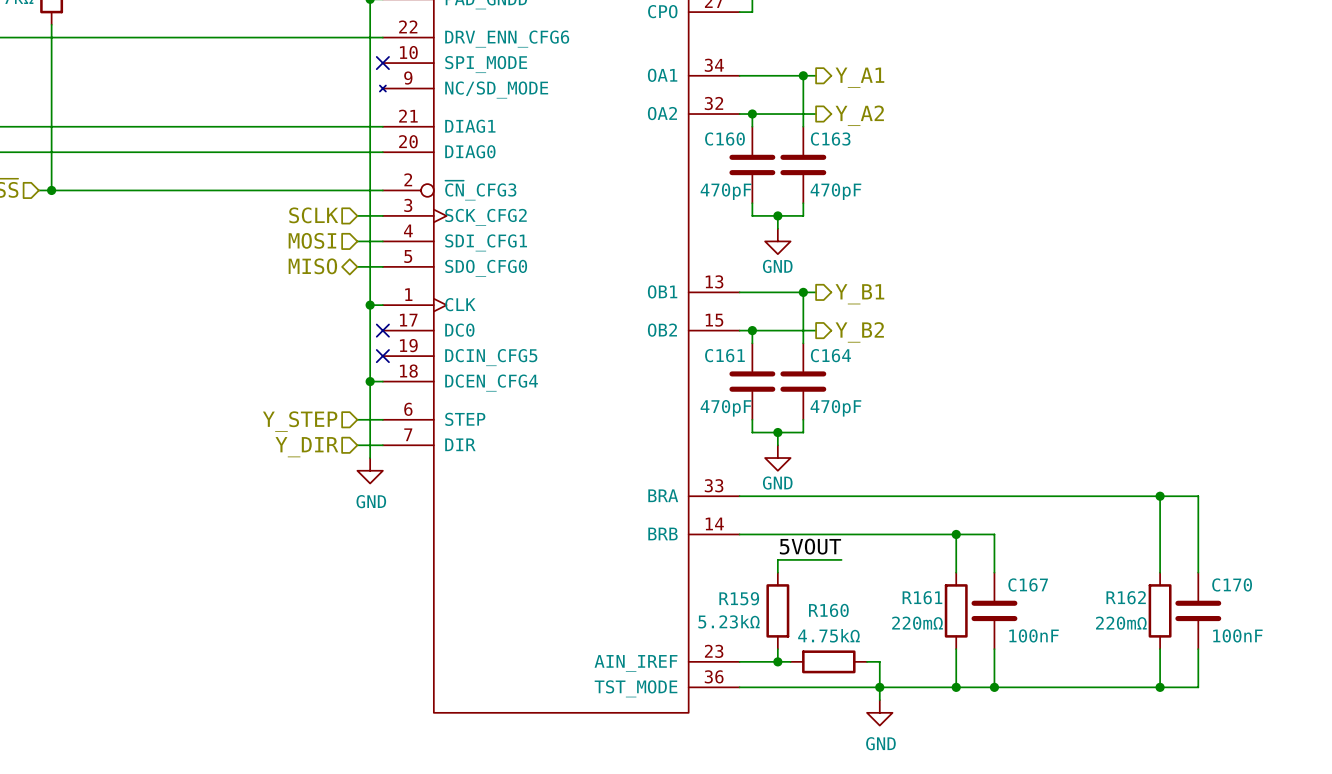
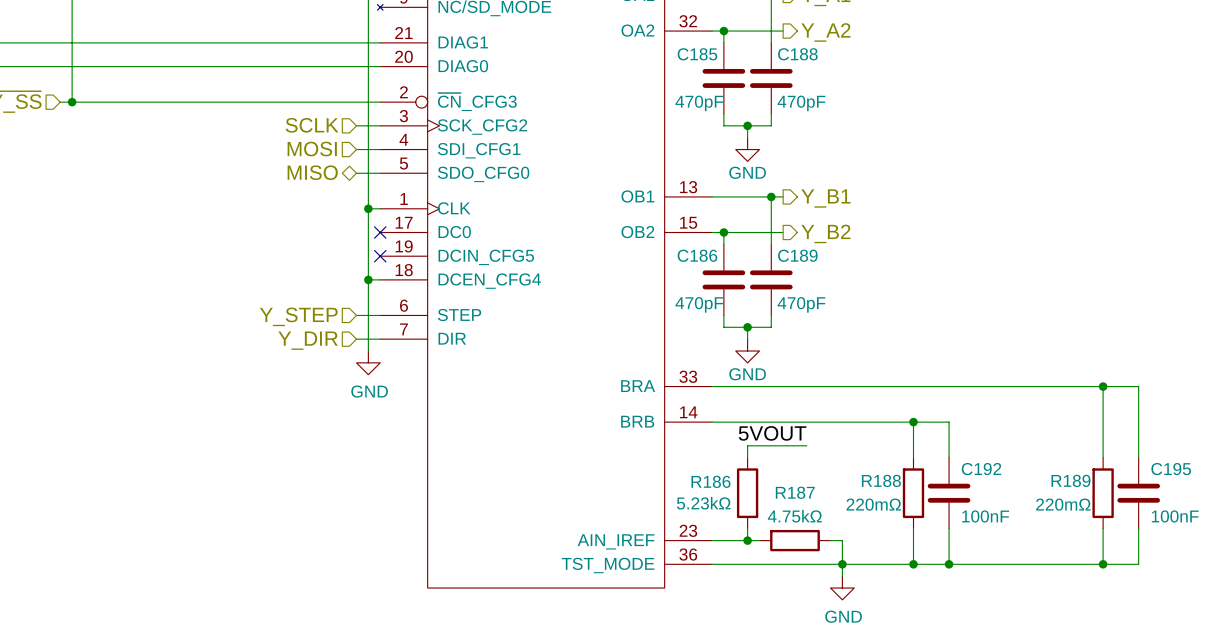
C160 name: C160 (724, 139) -> C185 (697, 54)
C163 name: C163 (830, 139) -> C188 (797, 54)
C161 name: C161 (724, 355) -> C186 (697, 255)
C164 name: C164 (830, 355) -> C189 (797, 255)
C167 name: C167 (1028, 584) -> C192 (981, 469)
C170 name: C170 (1232, 584) -> C195 (1171, 469)
R161 name: R161 (922, 597) -> R188 (881, 480)
R162 name: R162 (1126, 597) -> R189 (1070, 480)
R159 name: R159 (739, 598) -> R186 (710, 481)
R160 name: R160 (828, 610) -> R187 (795, 492)

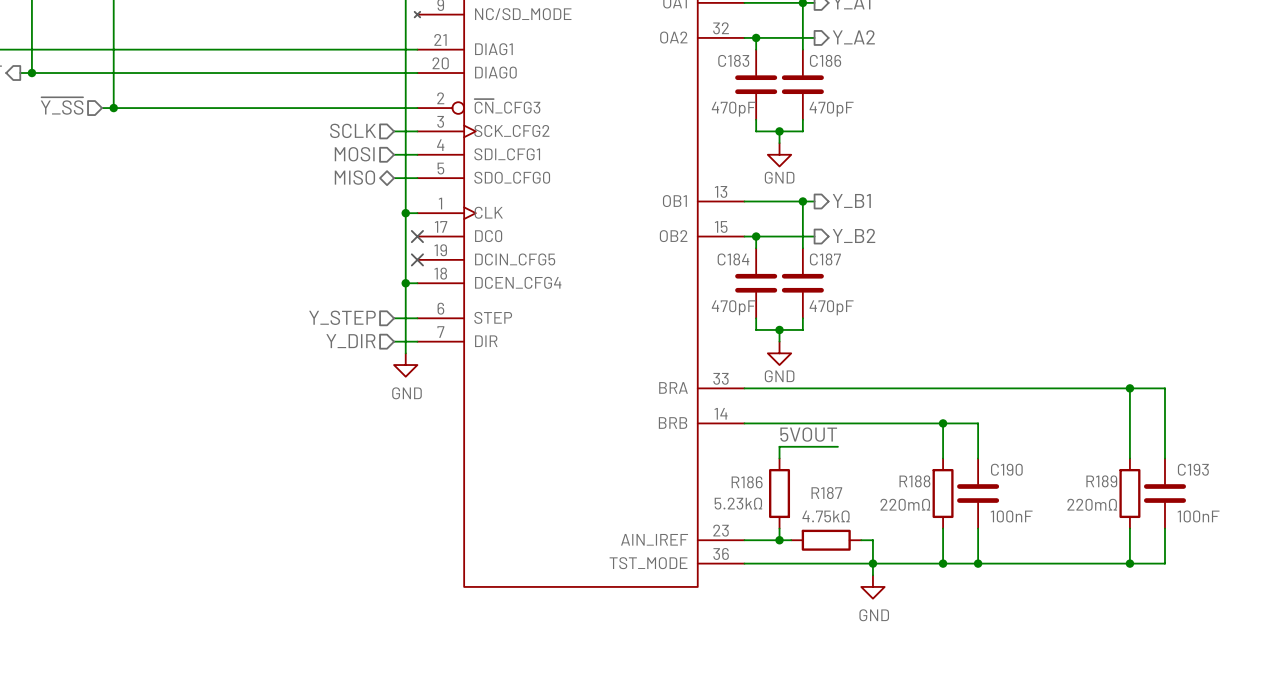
C185 name: C185 (697, 54) -> C183 (733, 60)
C188 name: C188 (797, 54) -> C186 (825, 60)
C186 name: C186 (697, 255) -> C184 (733, 259)
C189 name: C189 (797, 255) -> C187 (825, 259)
C192 name: C192 (981, 469) -> C190 (1006, 469)
C195 name: C195 (1171, 469) -> C193 (1193, 469)

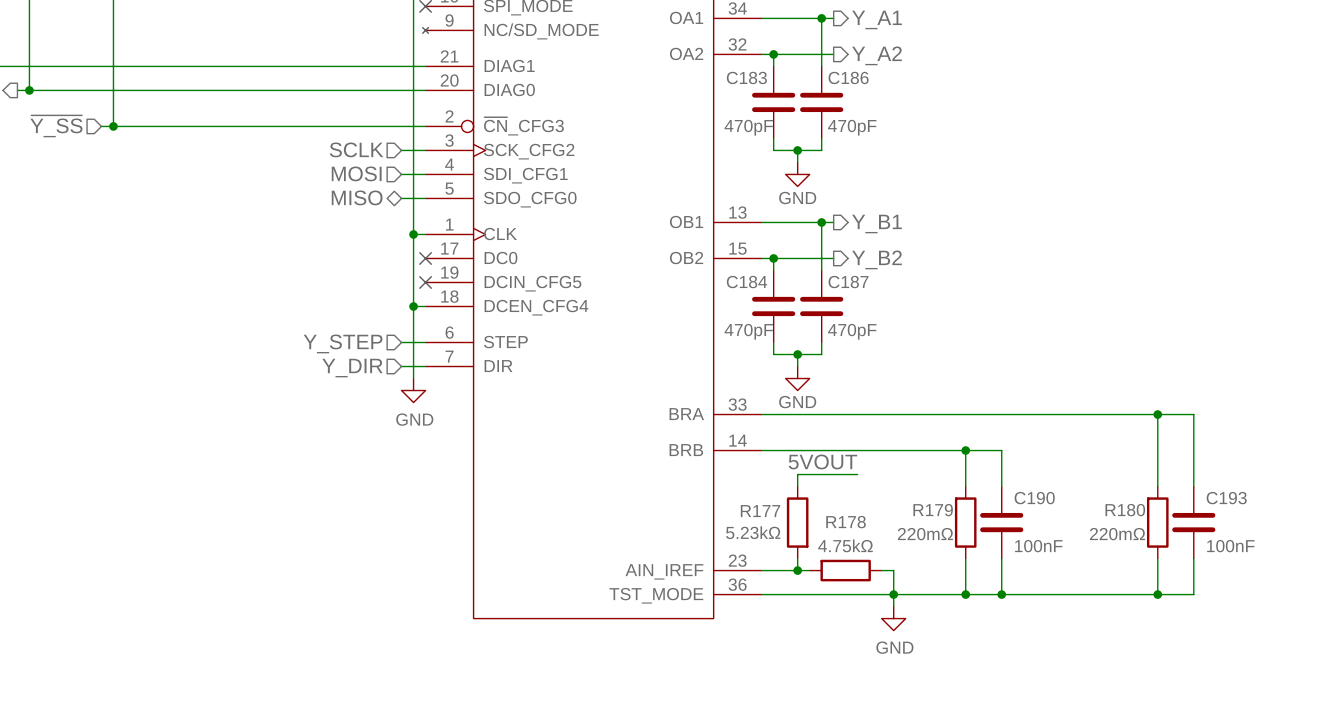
R188 name: R188 (914, 481) -> R179 (933, 510)
R189 name: R189 (1101, 481) -> R180 (1125, 510)
R186 name: R186 (747, 482) -> R177 (760, 511)
R187 name: R187 (826, 493) -> R178 (846, 522)

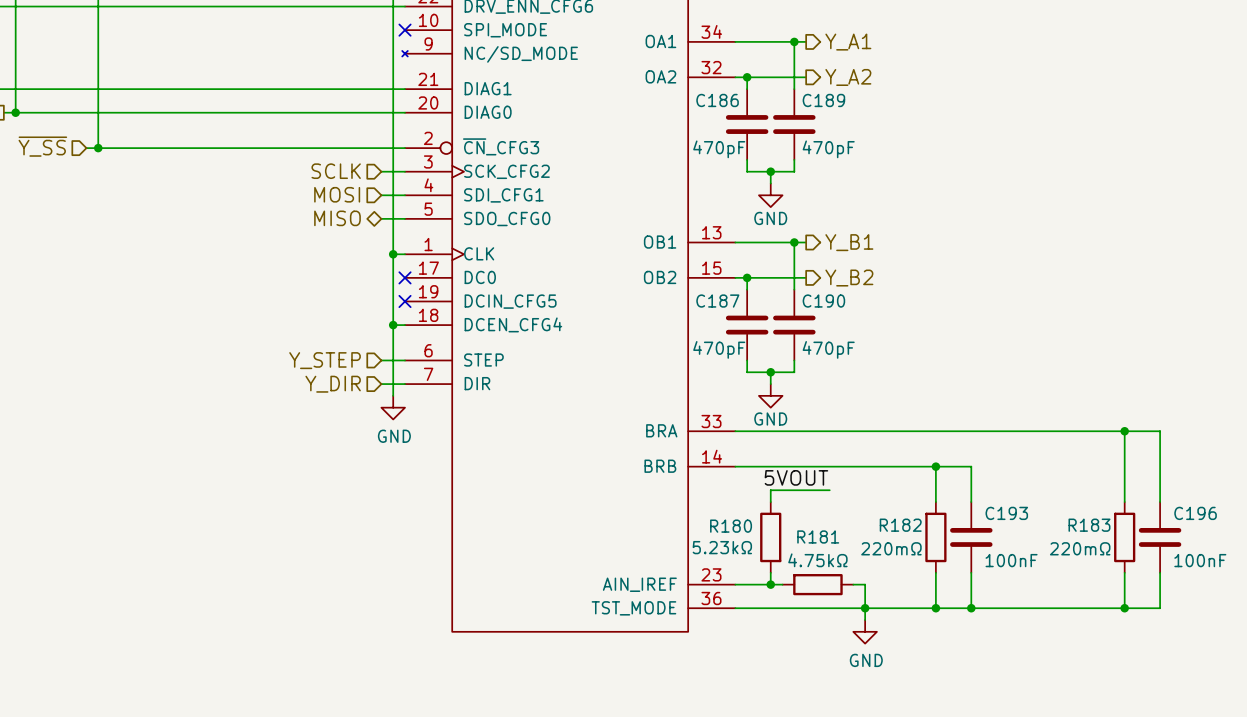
C183 name: C183 (746, 77) -> C186 (717, 100)
C186 name: C186 (848, 77) -> C189 (823, 100)
C184 name: C184 (746, 282) -> C187 (717, 301)
C187 name: C187 (848, 282) -> C190 (823, 301)
C190 name: C190 (1034, 498) -> C193 (1006, 513)
C193 name: C193 (1226, 498) -> C196 (1195, 513)
R179 name: R179 (933, 510) -> R182 (900, 525)
R180 name: R180 (1125, 510) -> R183 (1089, 525)
R177 name: R177 (760, 511) -> R180 (731, 526)
R178 name: R178 (846, 522) -> R181 (818, 537)

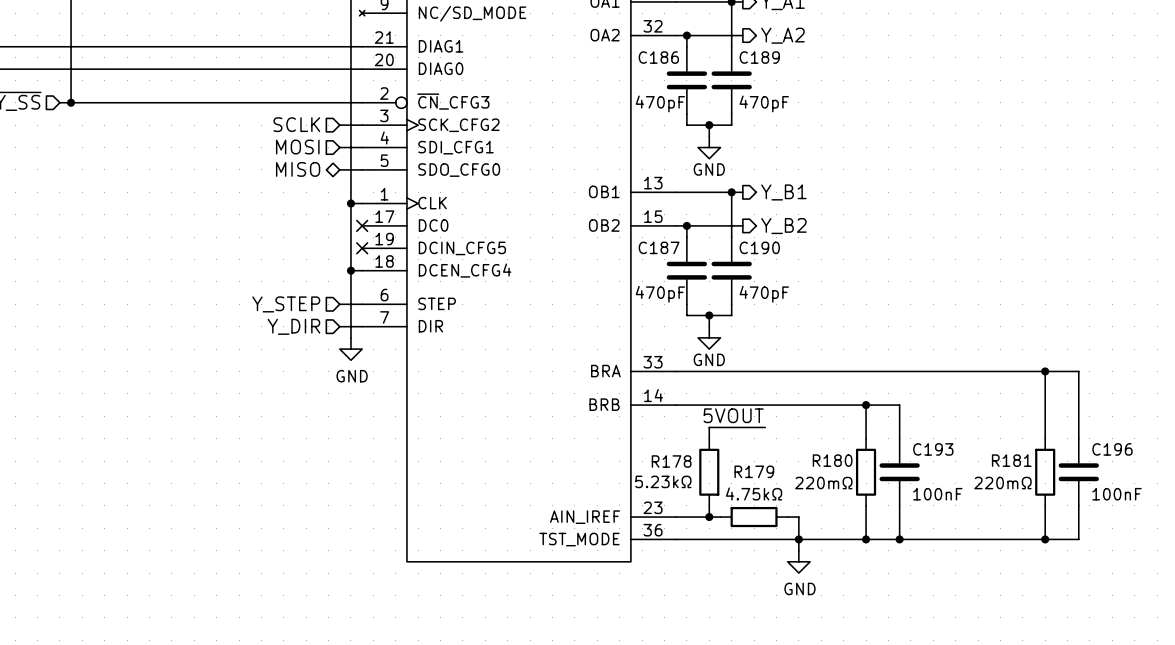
R182 name: R182 (900, 525) -> R180 (832, 460)
R183 name: R183 (1089, 525) -> R181 (1011, 460)
R180 name: R180 (731, 526) -> R178 (671, 461)
R181 name: R181 (818, 537) -> R179 (754, 471)

